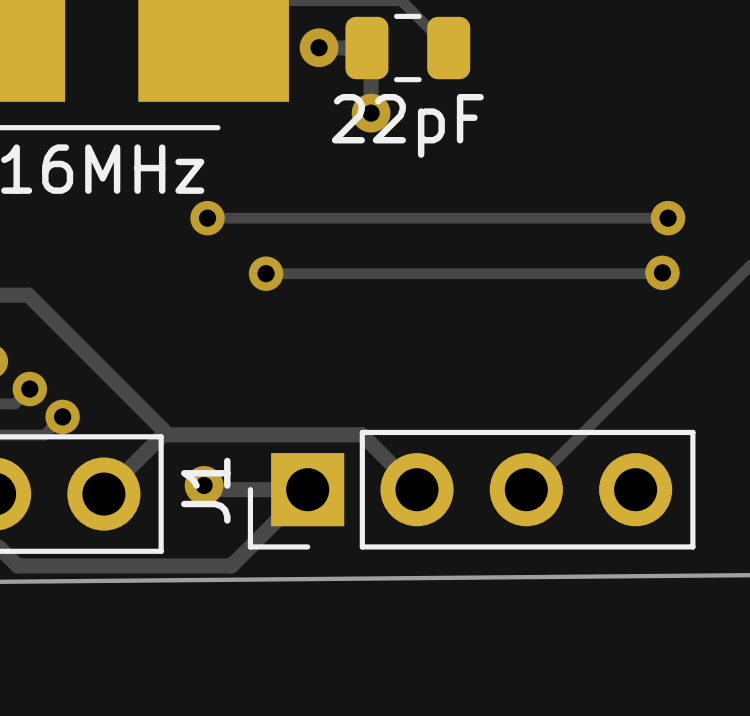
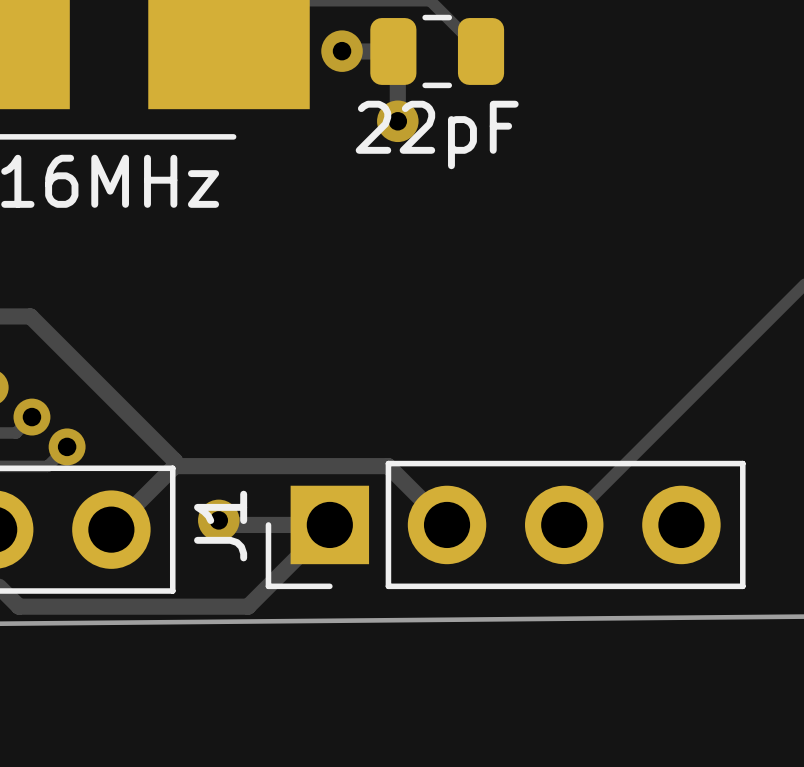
track: (207, 218) (668, 218) -> none
via: (207, 218) -> none
via: (668, 218) -> none
track: (662, 272) (266, 273) -> none
via: (662, 272) -> none
via: (266, 273) -> none

